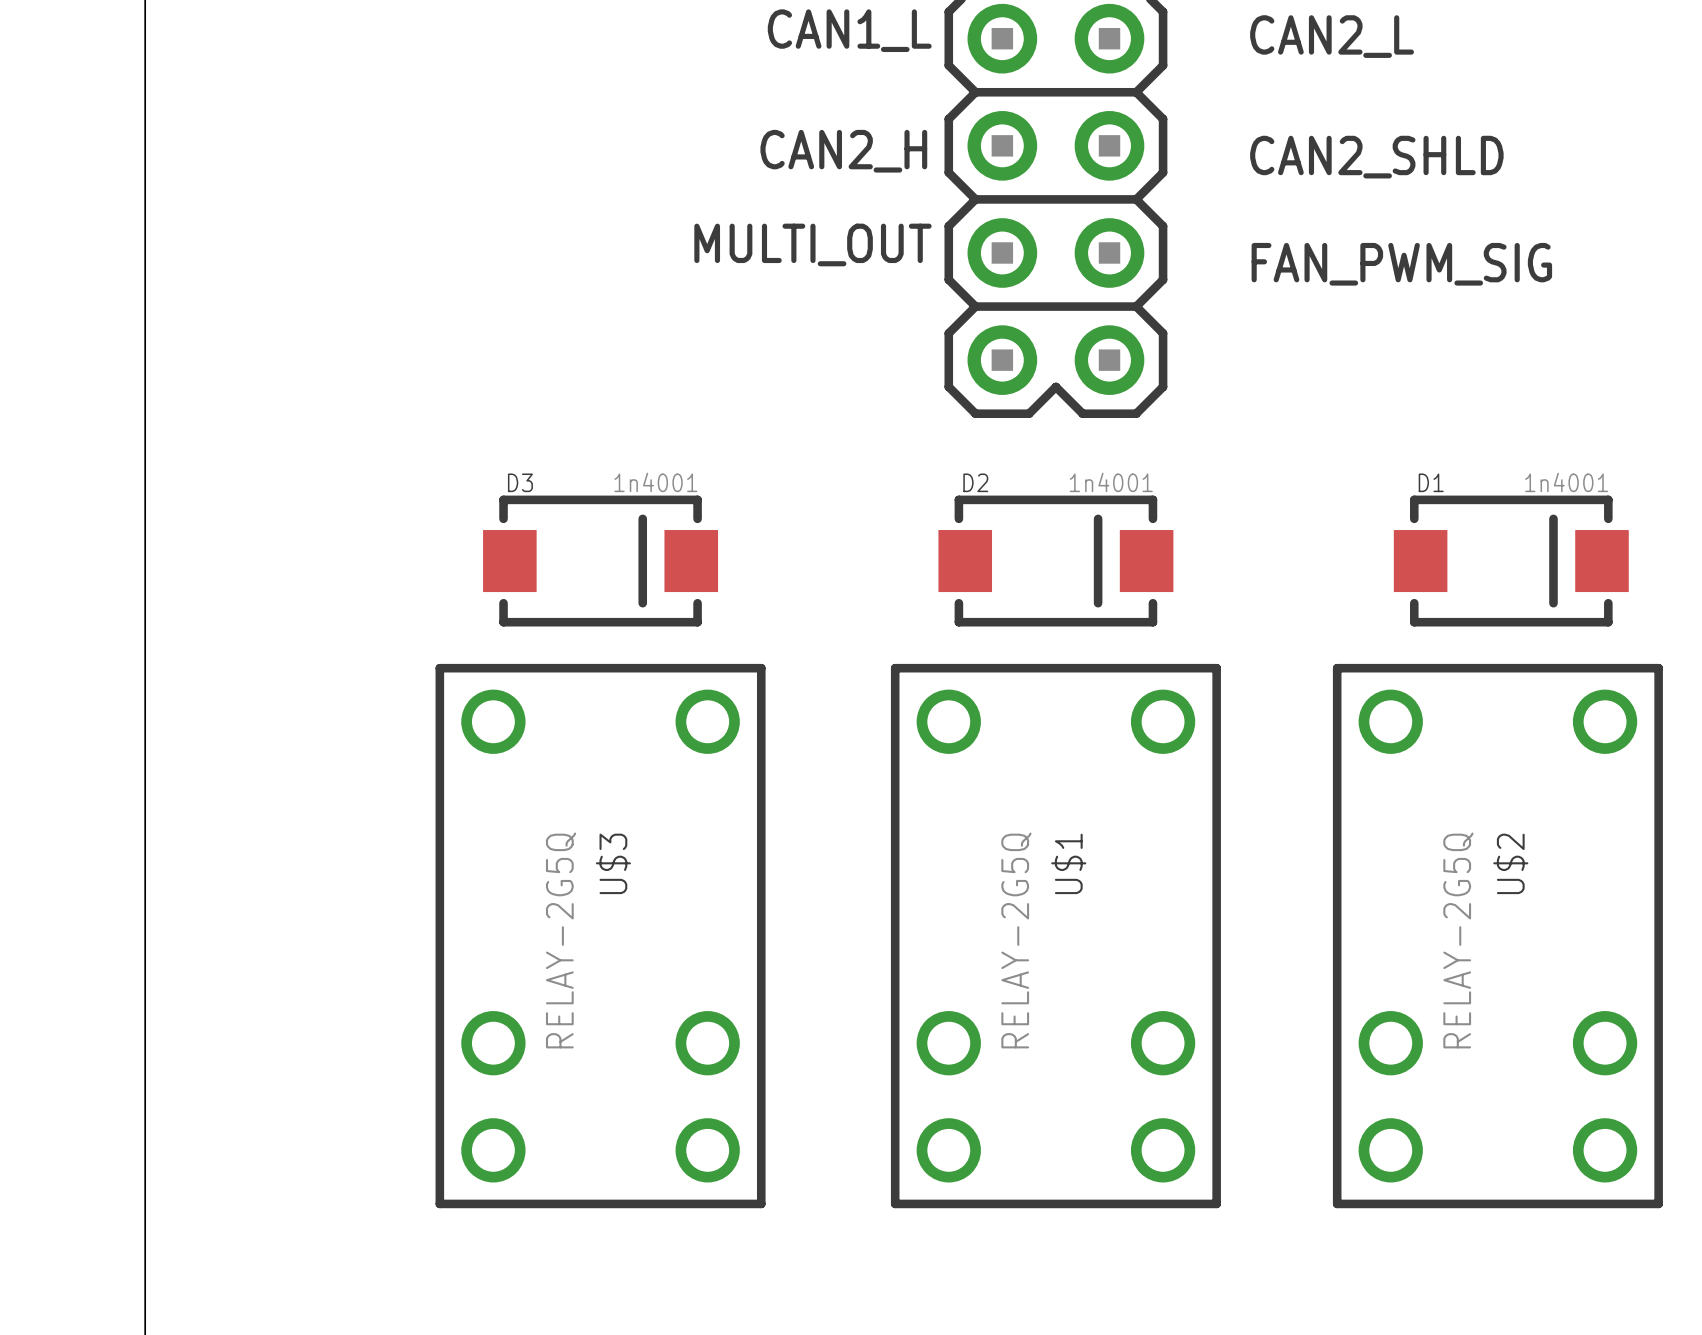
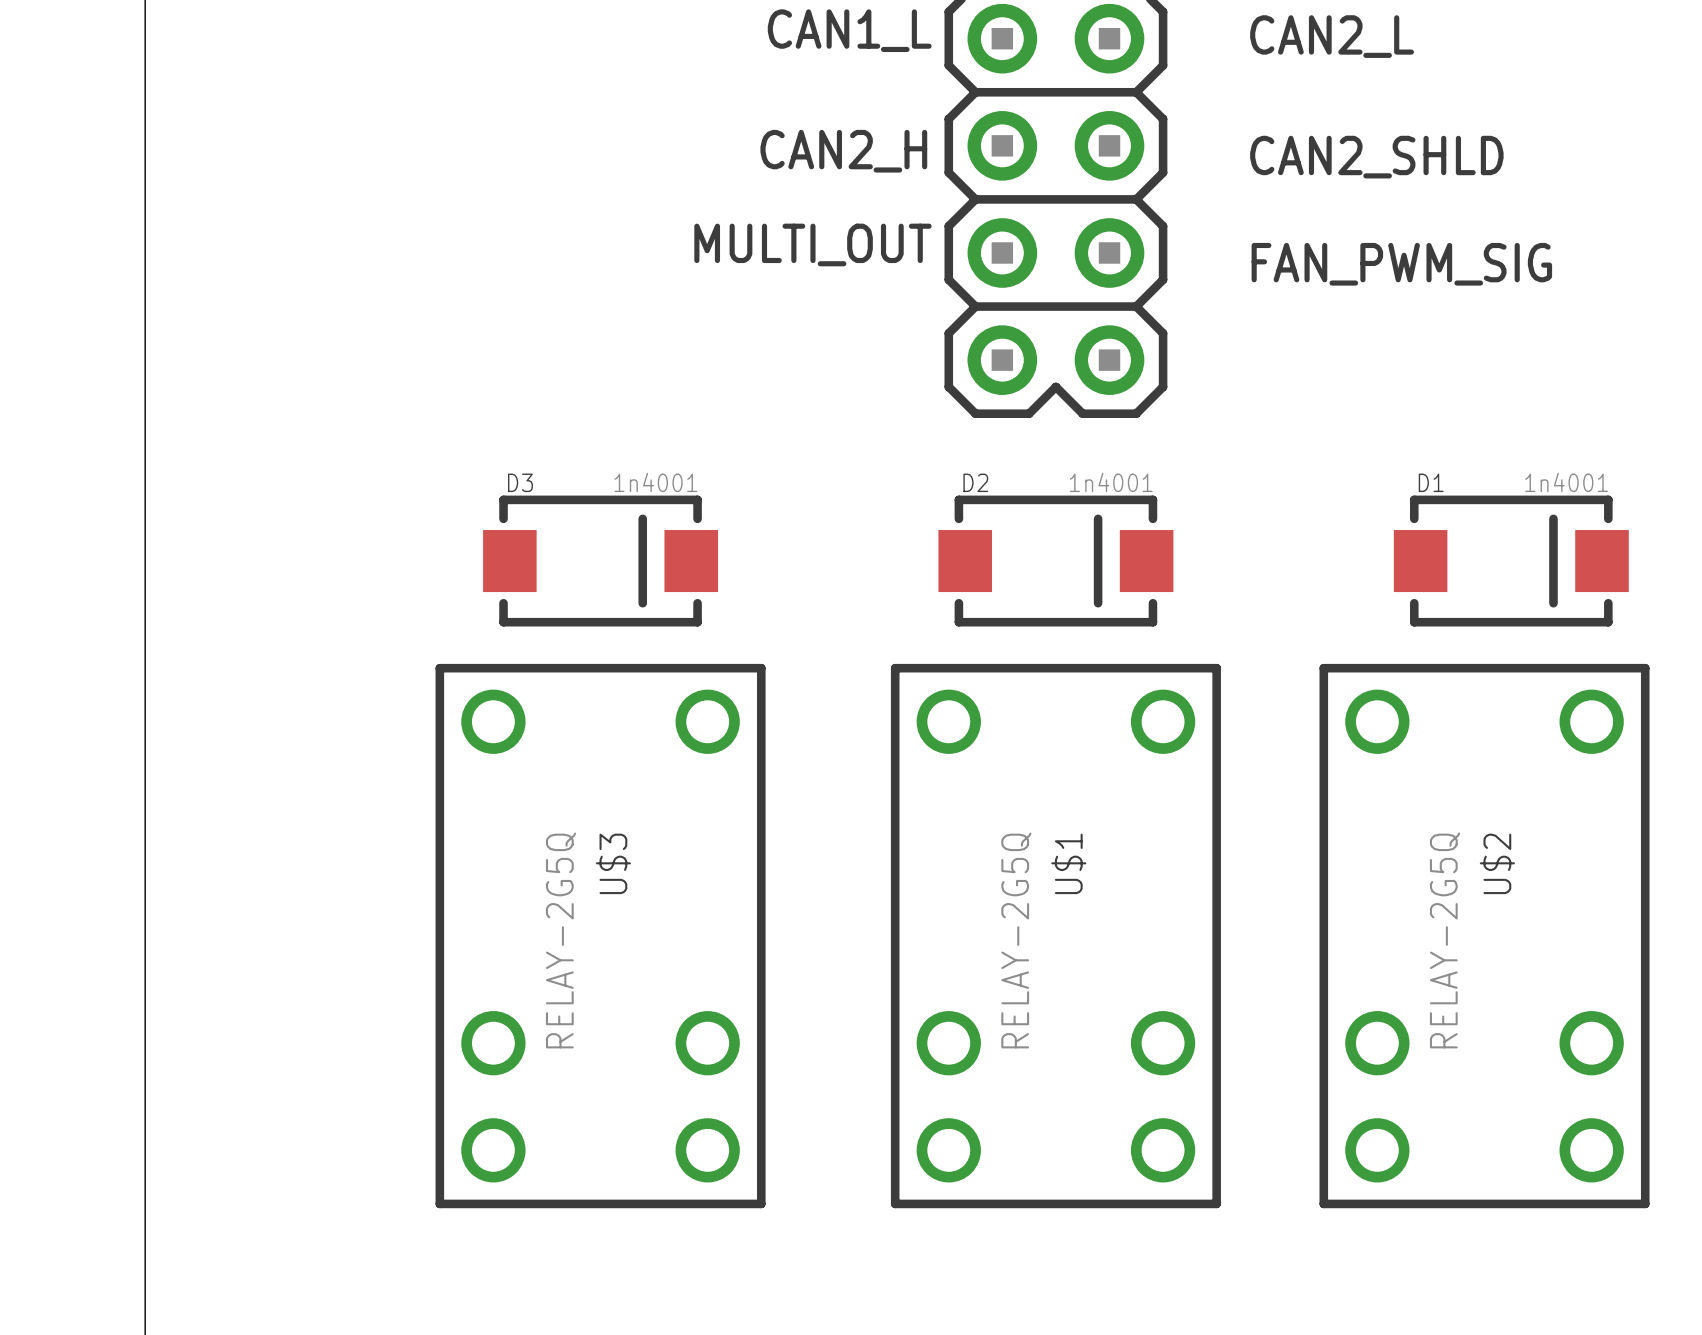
U$2 position: (1497, 936) -> (1484, 936)

